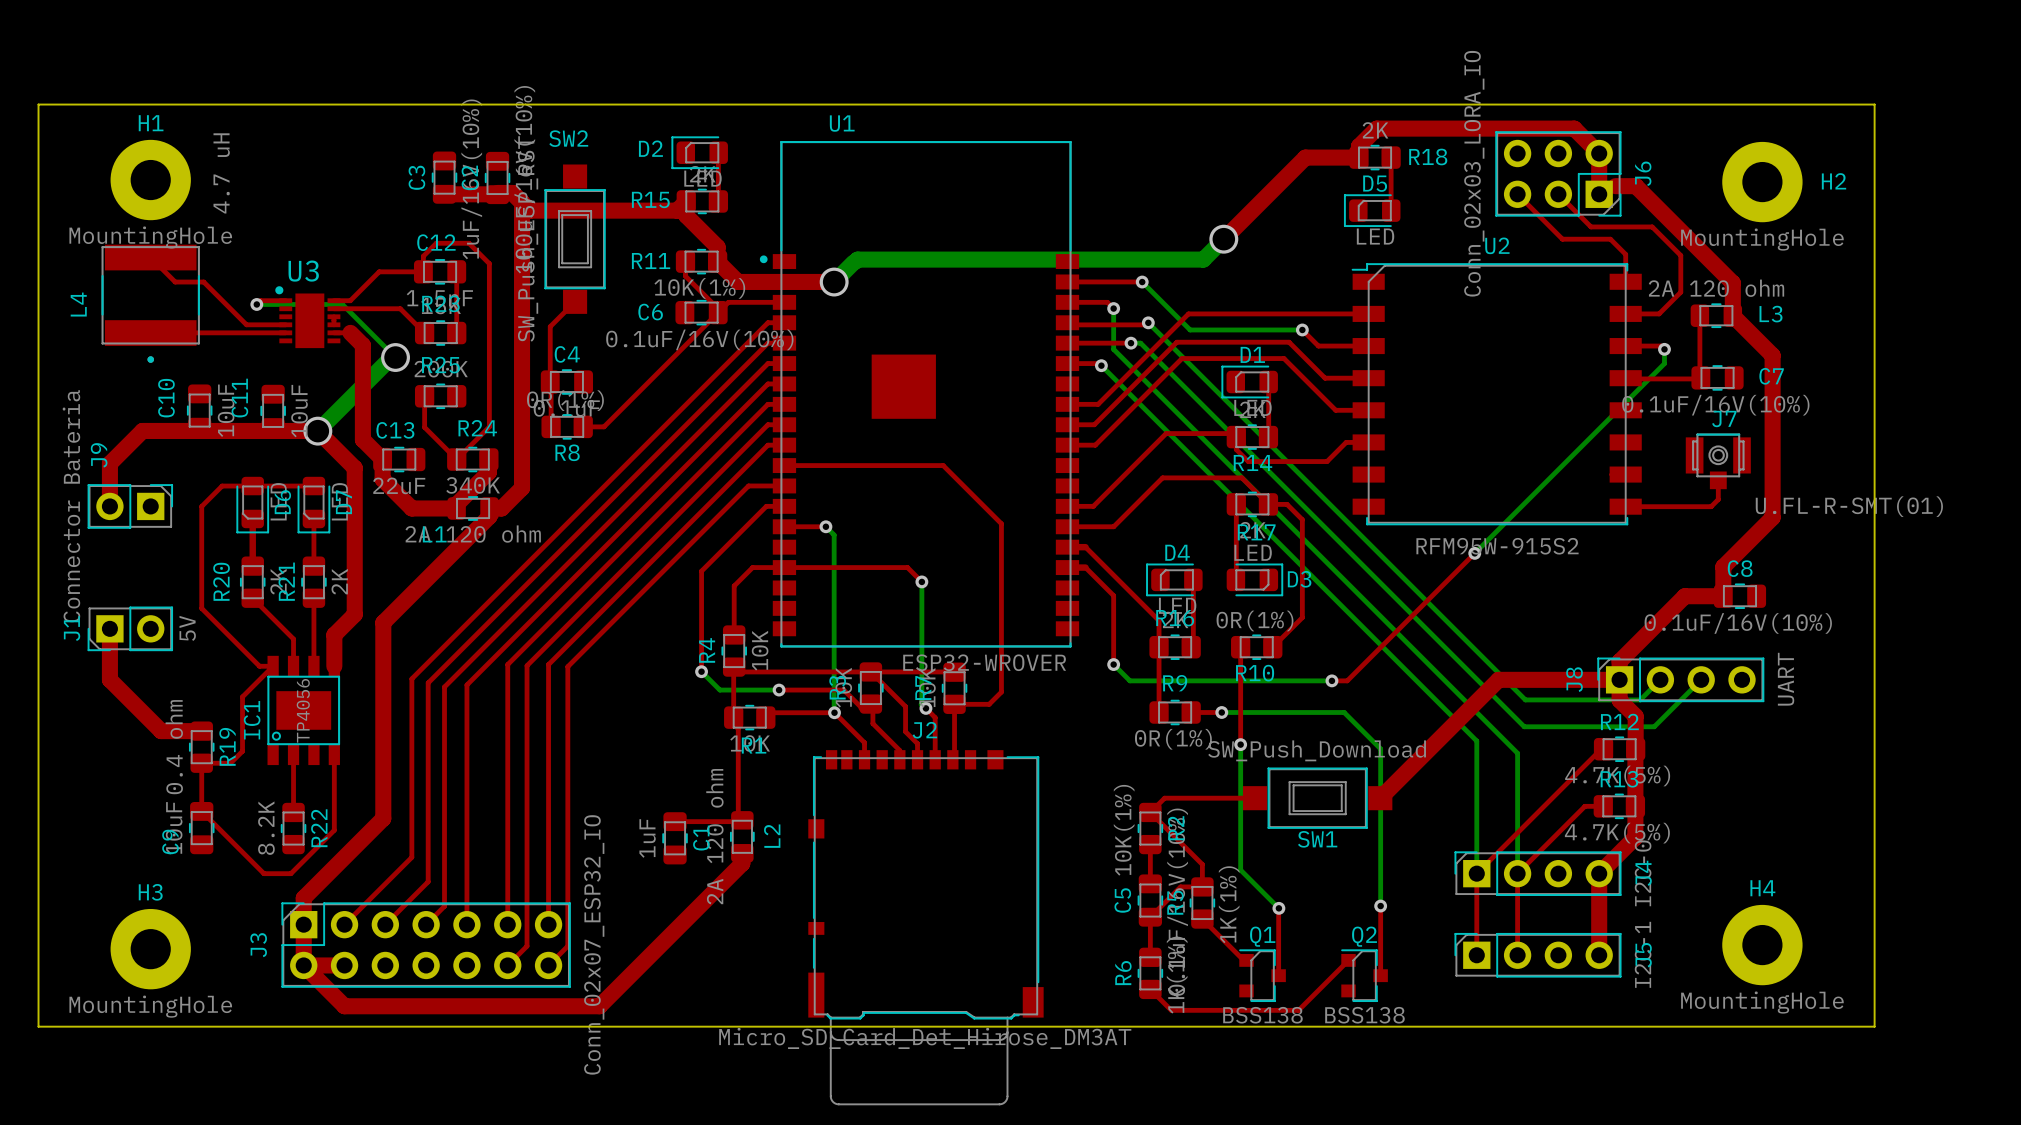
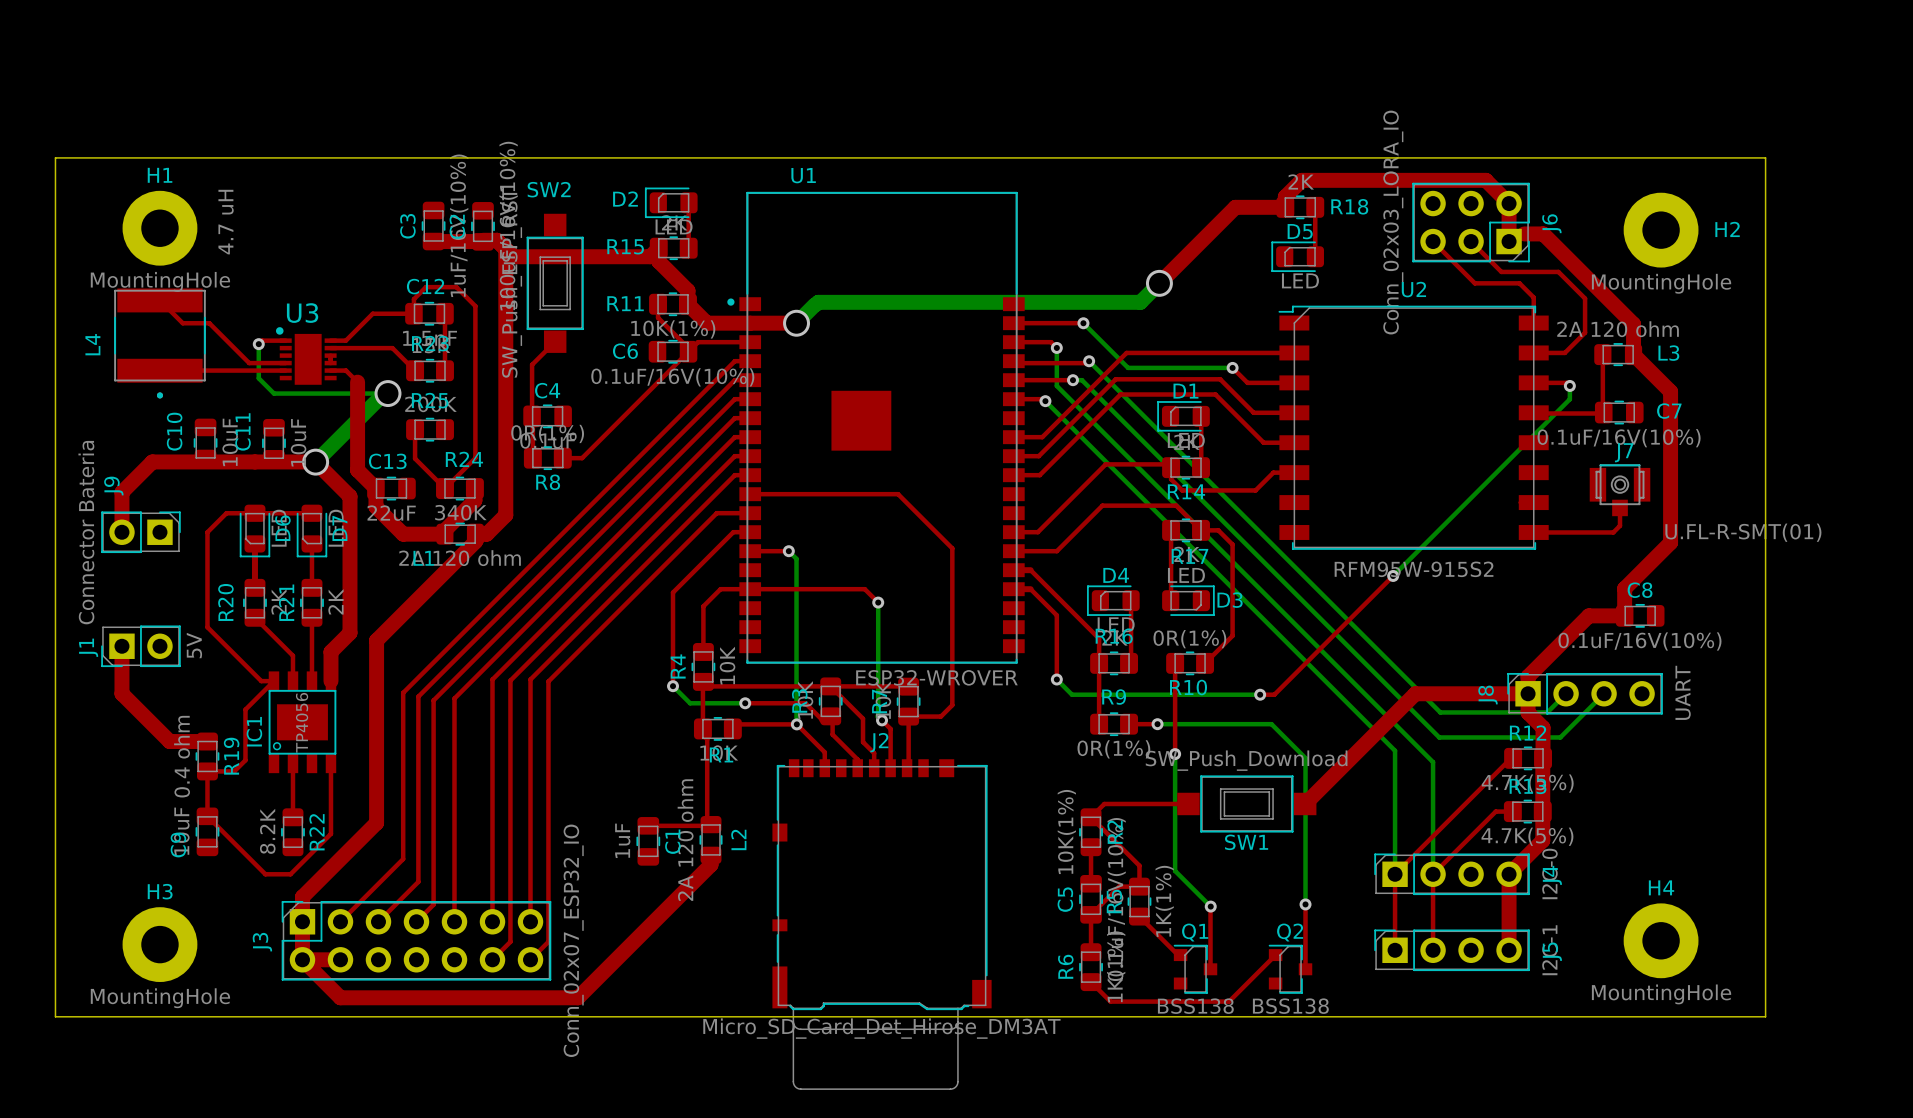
bottom track: (256, 304) (342, 304) (395, 357) -> (258, 344) (258, 378) (273, 393) (387, 393)
top track width: thick (350, 332) (362, 345) -> thin (346, 370) (357, 382)

